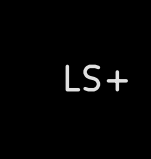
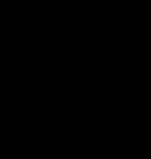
text: LS+ (96, 78) -> none

